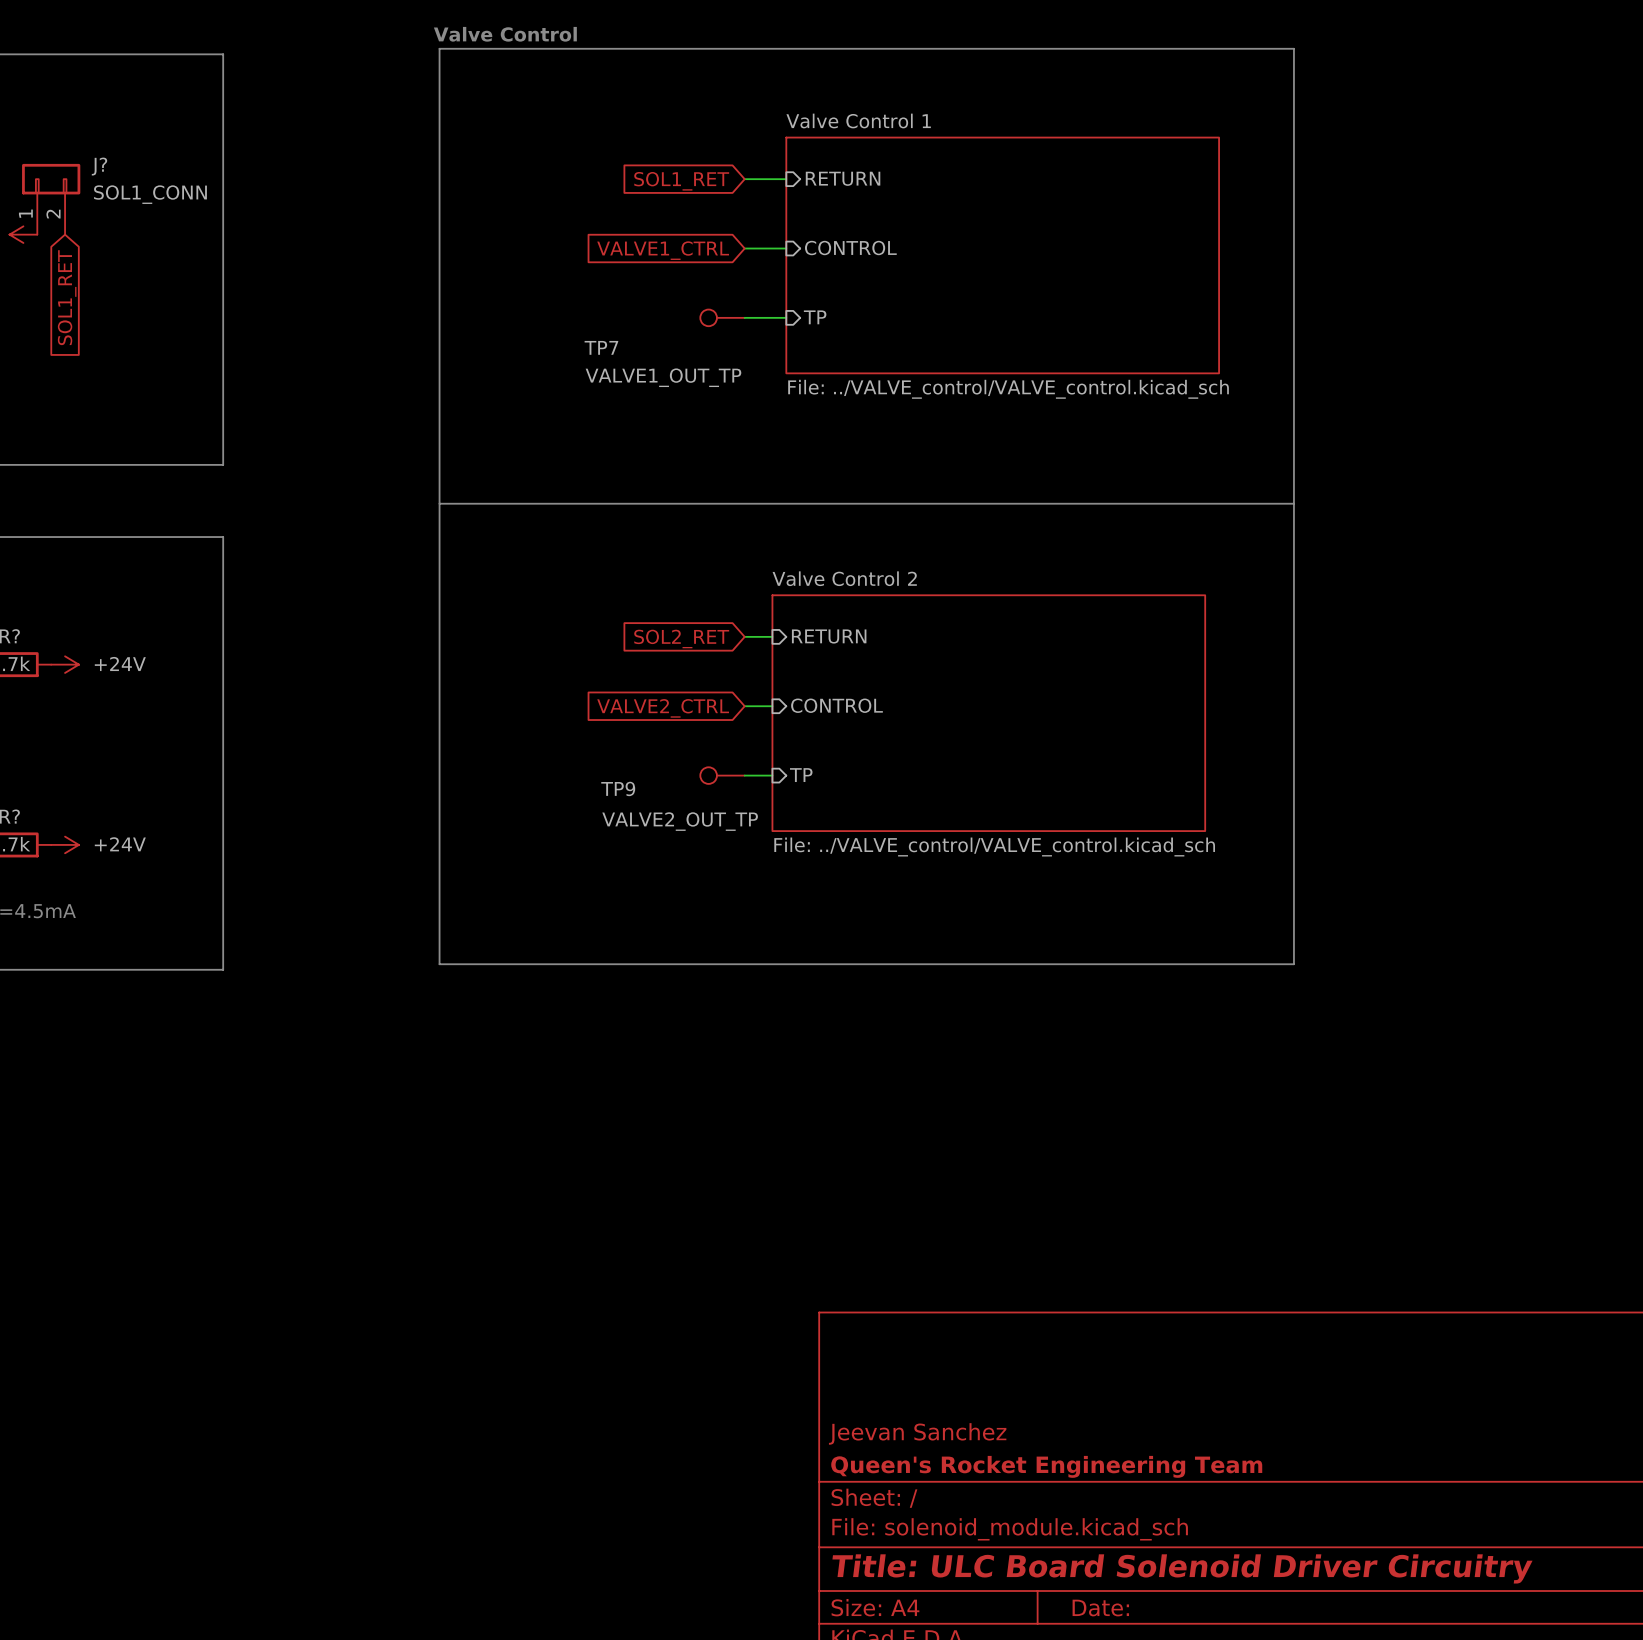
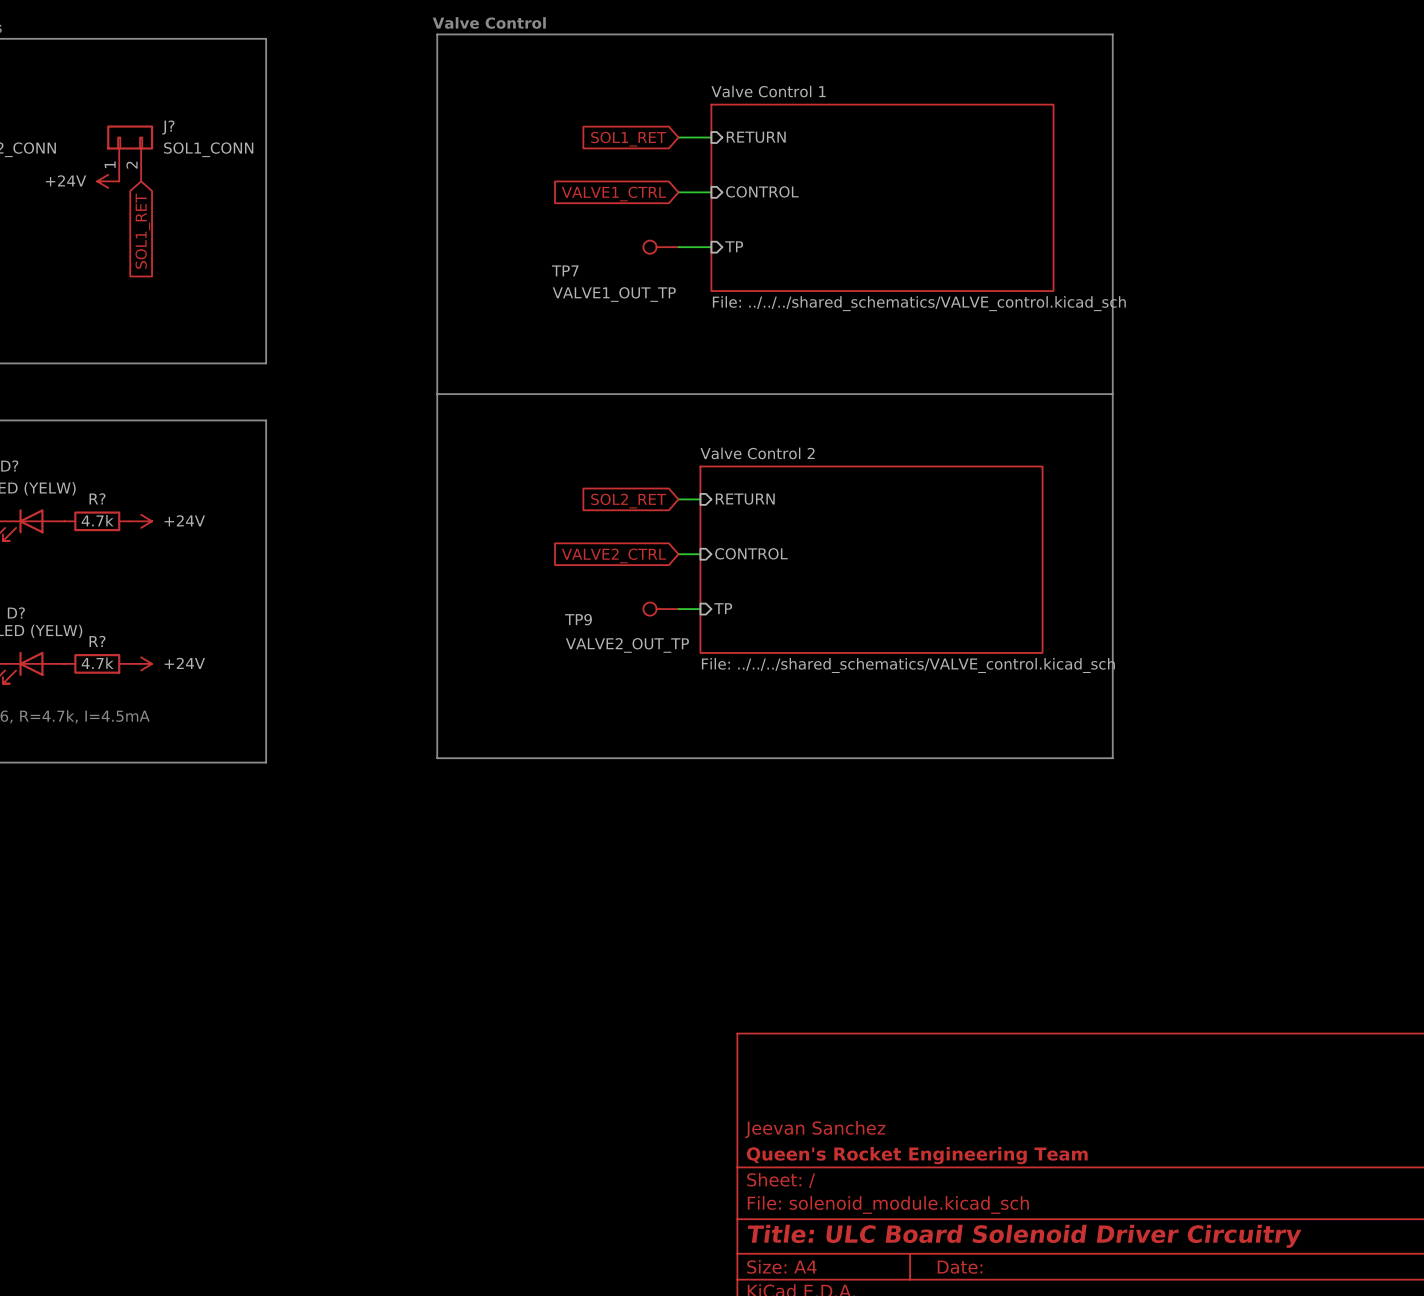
sheet Valve Control 1 value: File: ../VALVE_control/VALVE_control.kicad_sch (1008, 389) -> File: ../../../shared_schematics/VALVE_control.kicad_sch (919, 303)
sheet Valve Control 2 value: File: ../VALVE_control/VALVE_control.kicad_sch (994, 847) -> File: ../../../shared_schematics/VALVE_control.kicad_sch (908, 665)

